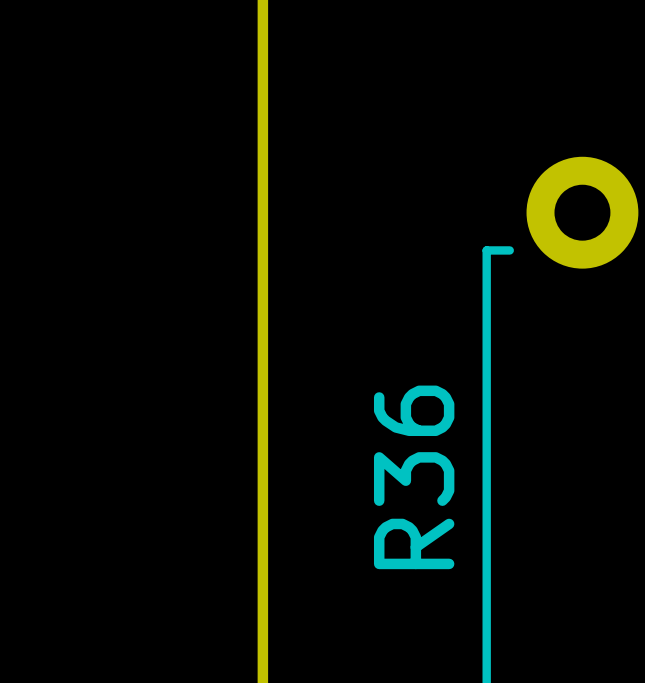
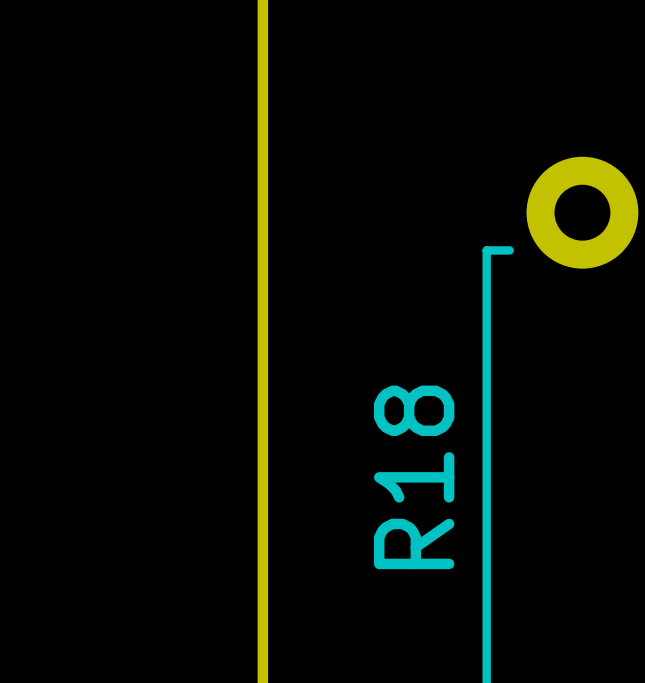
R36 name: R36 (414, 477) -> R18 (414, 477)

